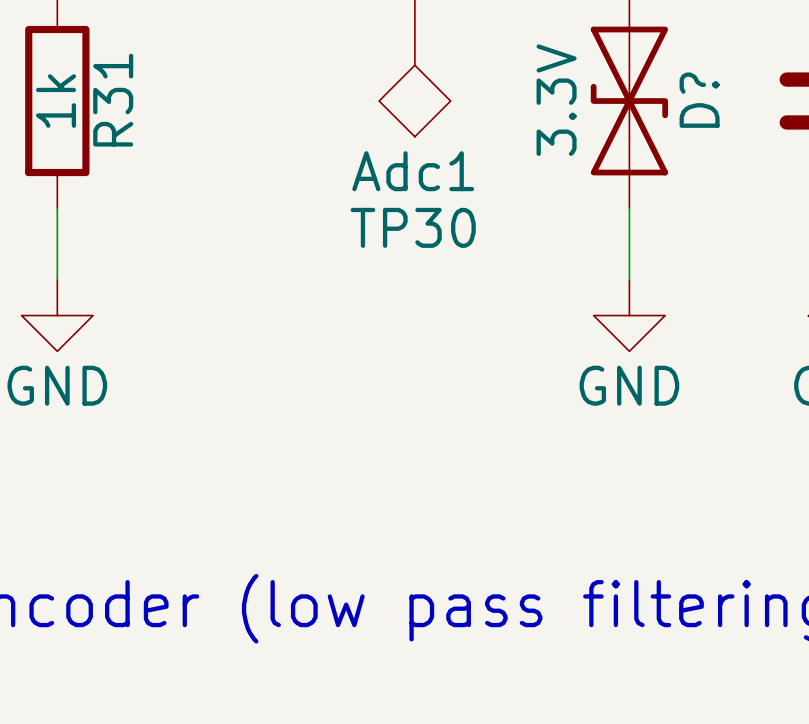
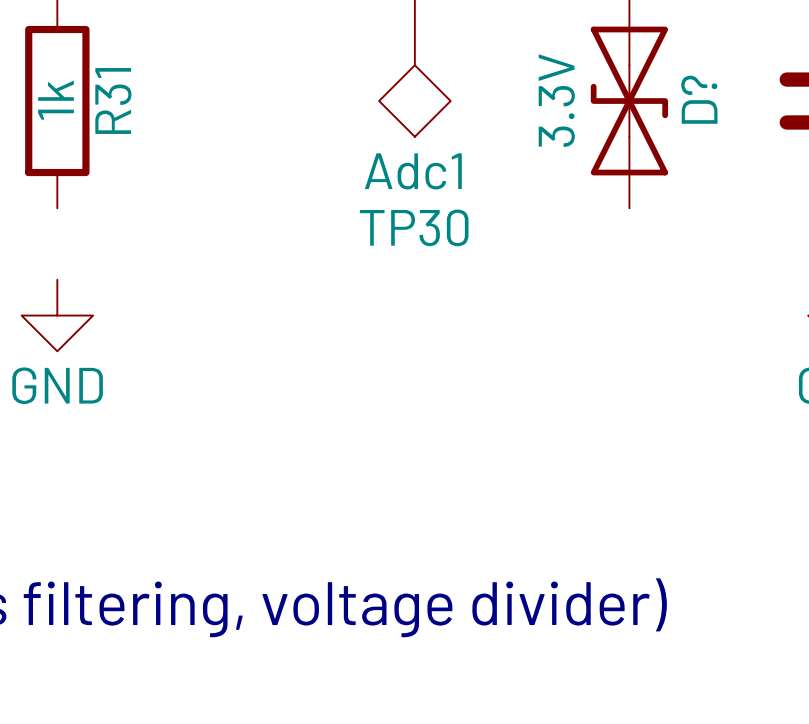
wire: (57, 208) (57, 279) -> none
wire: (629, 208) (629, 279) -> none
power symbol: GND (629, 315) -> none

